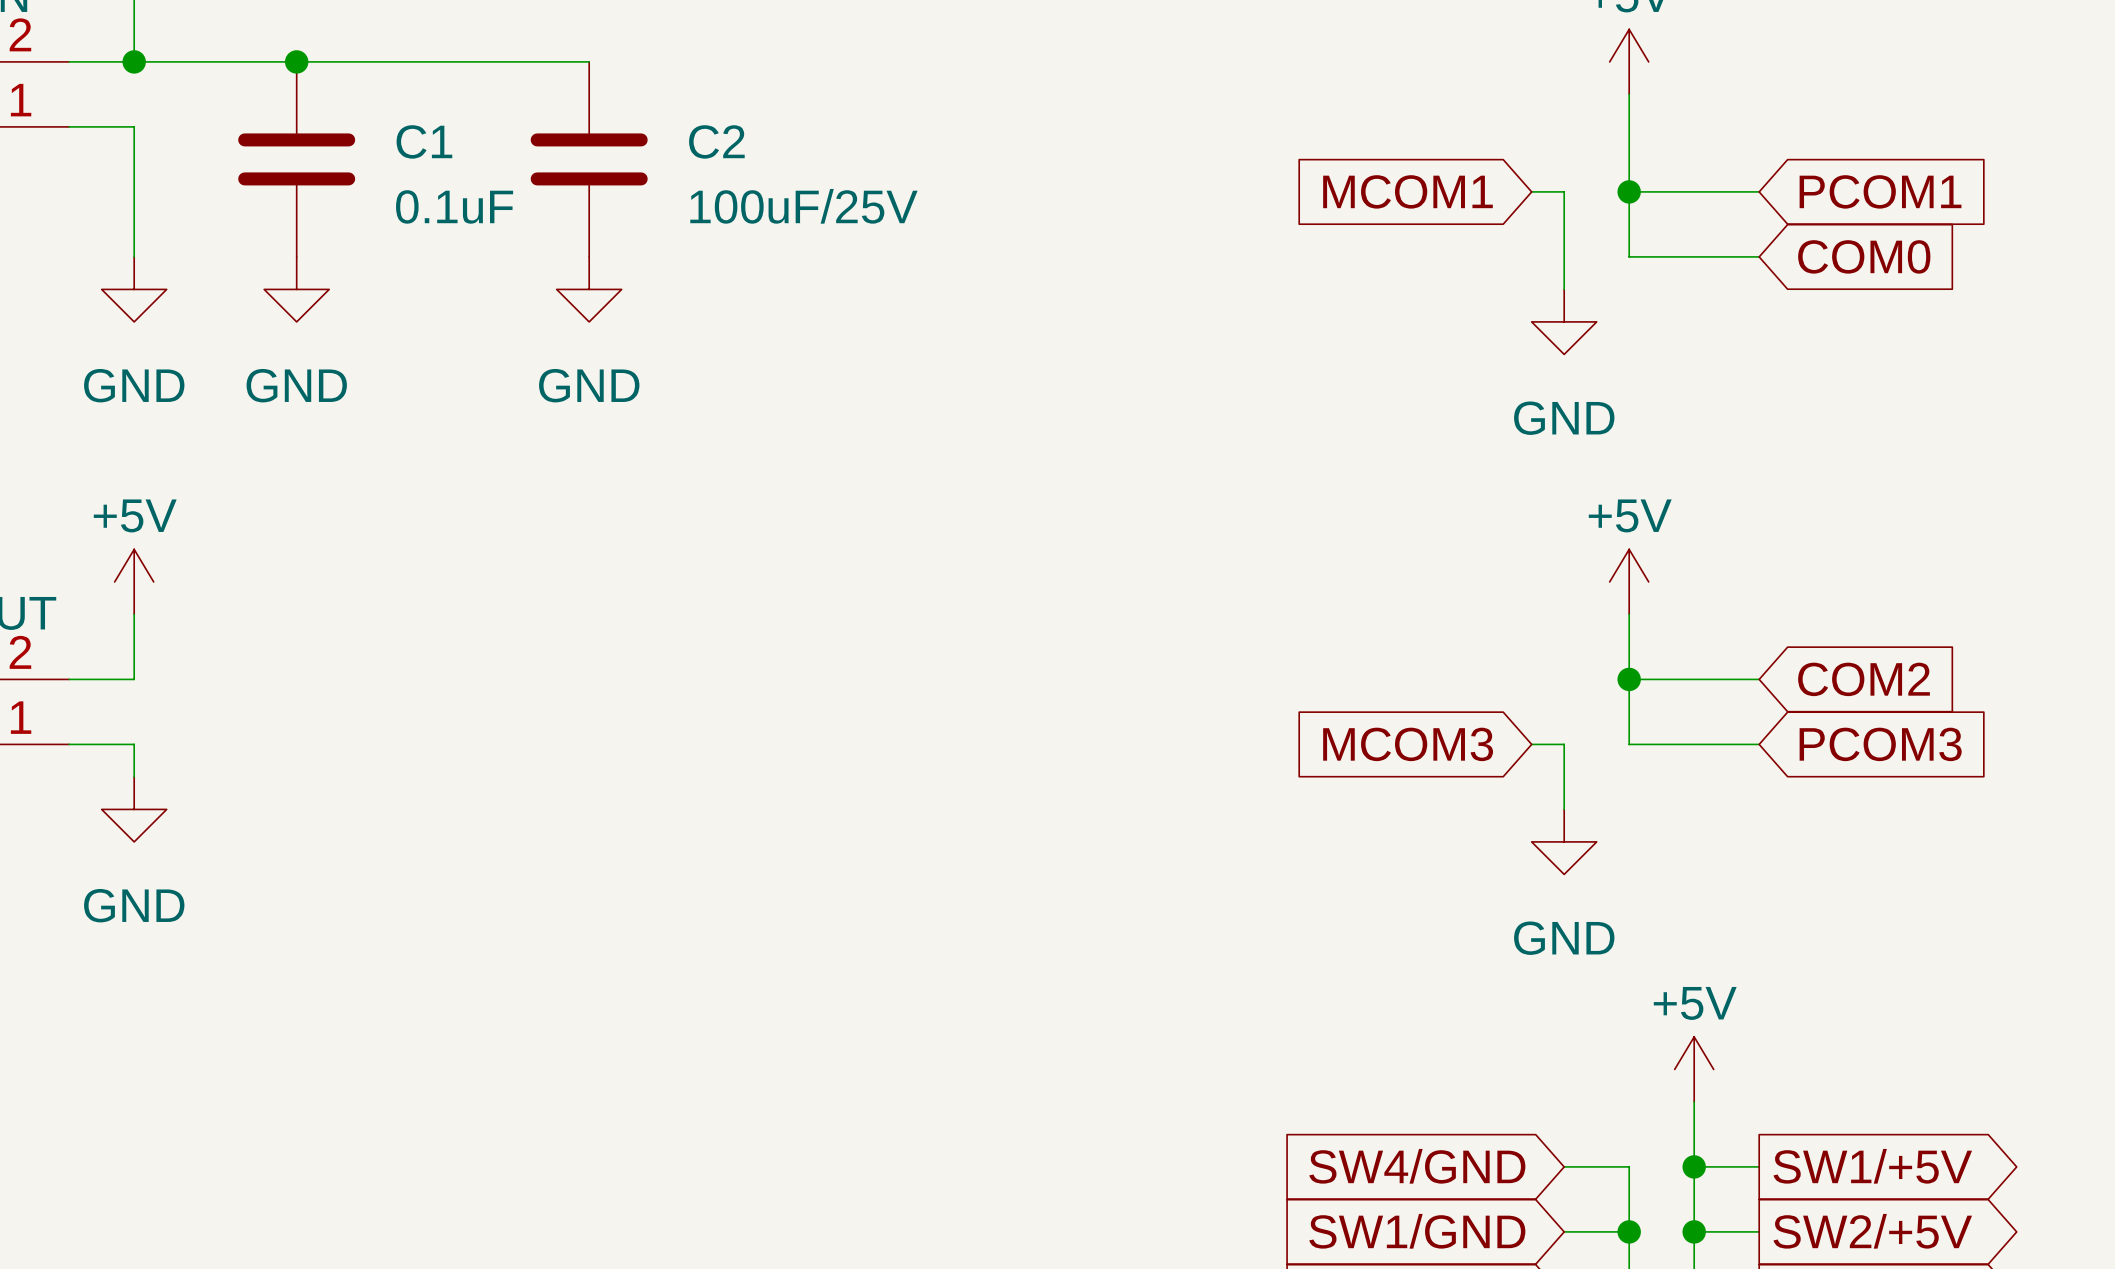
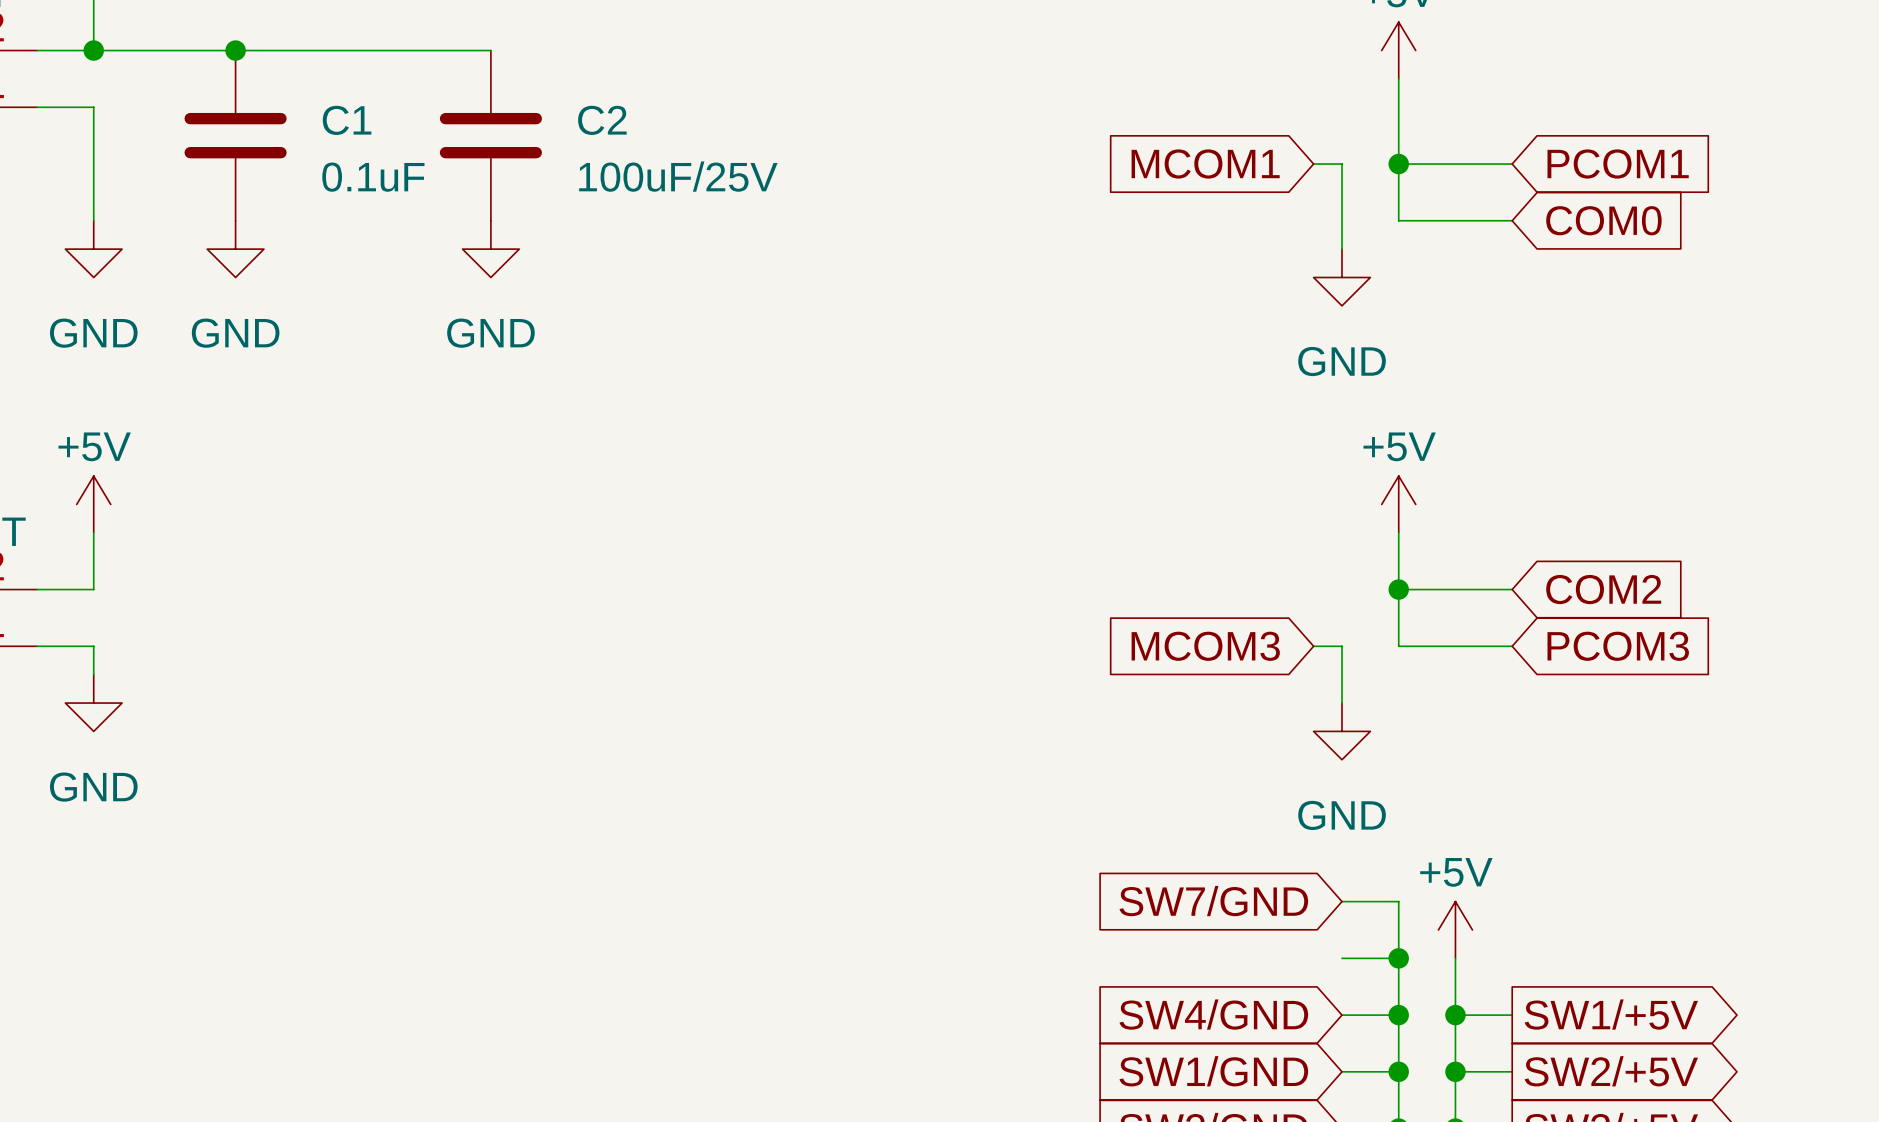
global label: none -> SW7/GND (1213, 901)
wire: none -> (1341, 901) (1398, 901) (1398, 1015)
wire: none -> (1341, 958) (1398, 958)
junction: none -> (1398, 958)
junction: none -> (1398, 1015)

